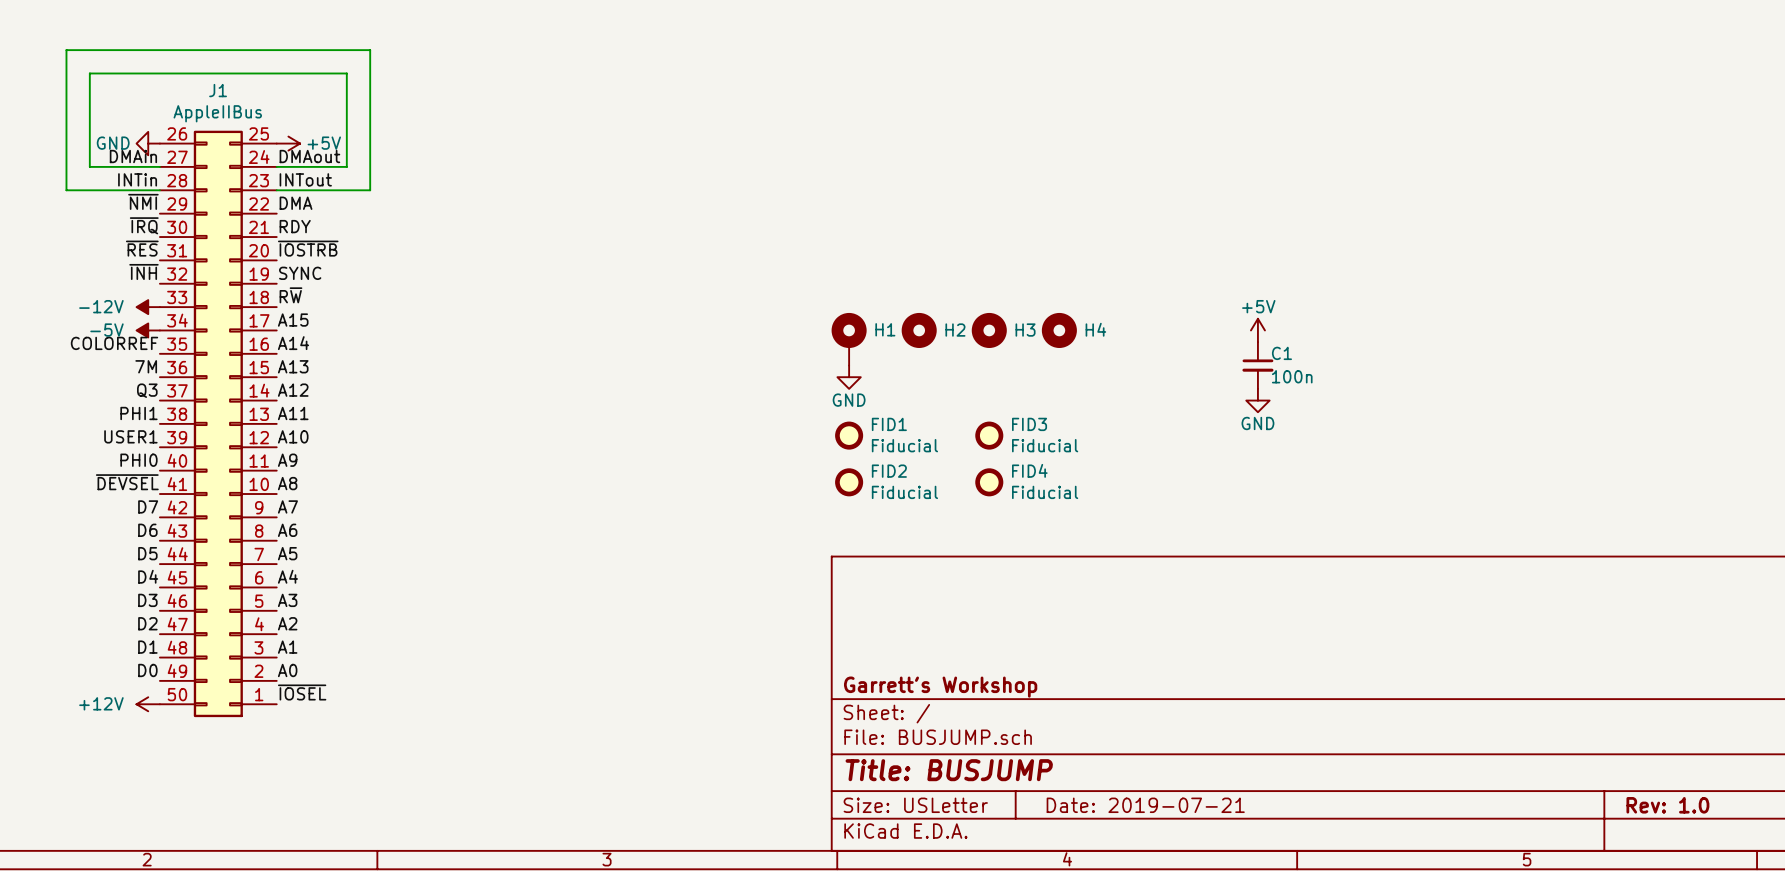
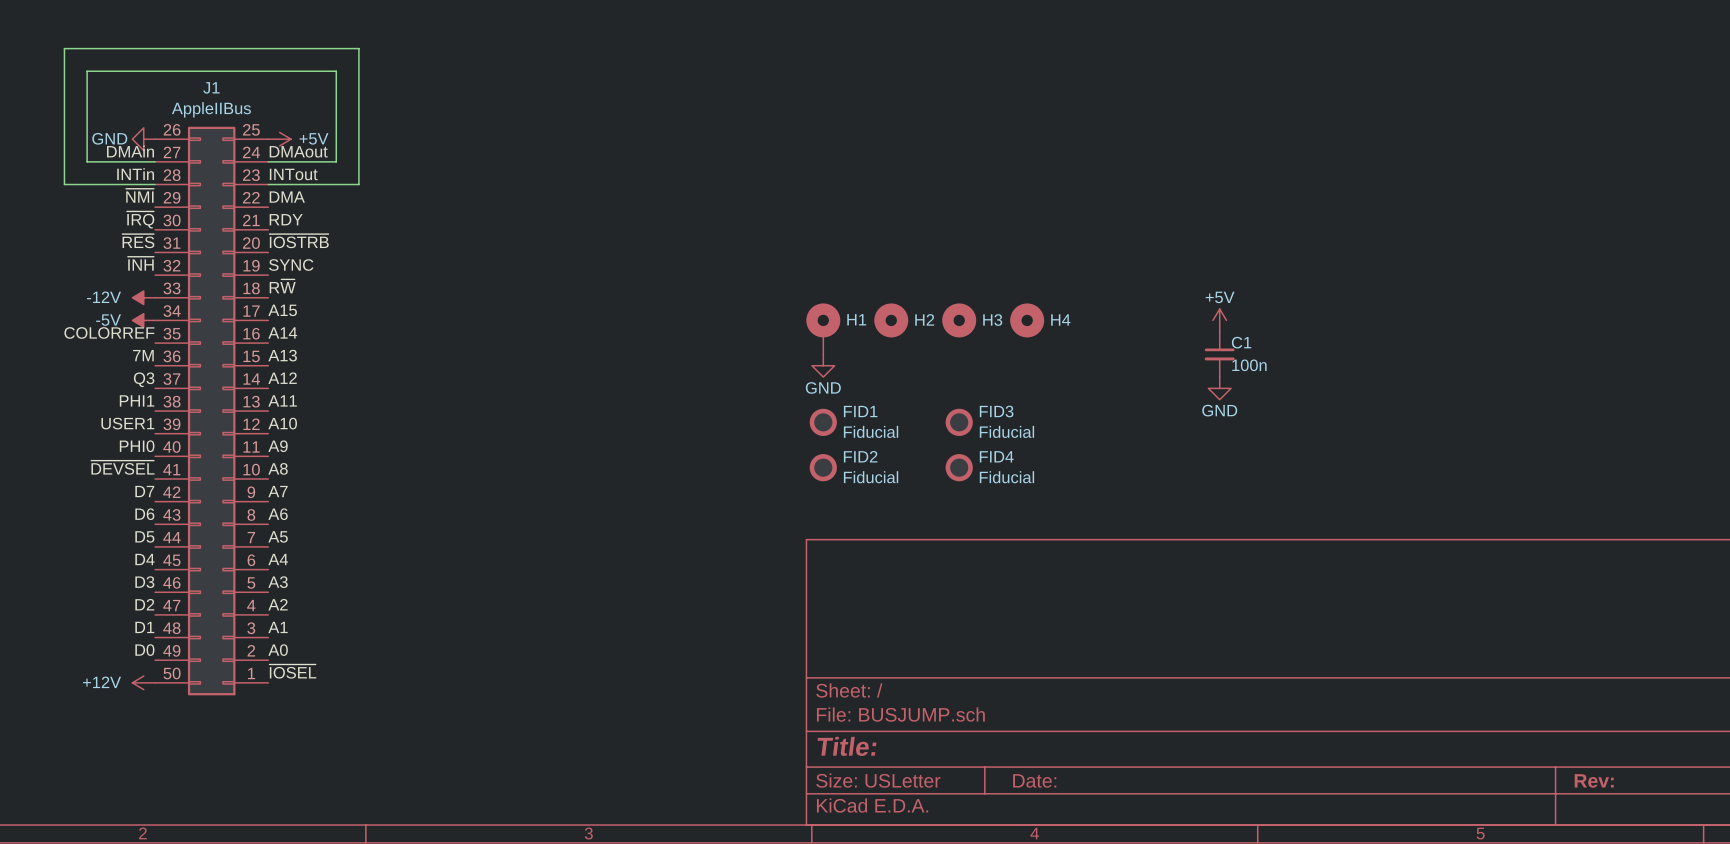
title block: Garrett's Workshop (940, 687) -> none
title block: Title: BUSJUMP (949, 770) -> Title: (846, 746)
title block: Date: 2019-07-21 (1145, 805) -> Date: (1034, 780)
title block: Rev: 1.0 (1667, 805) -> Rev: (1594, 780)

